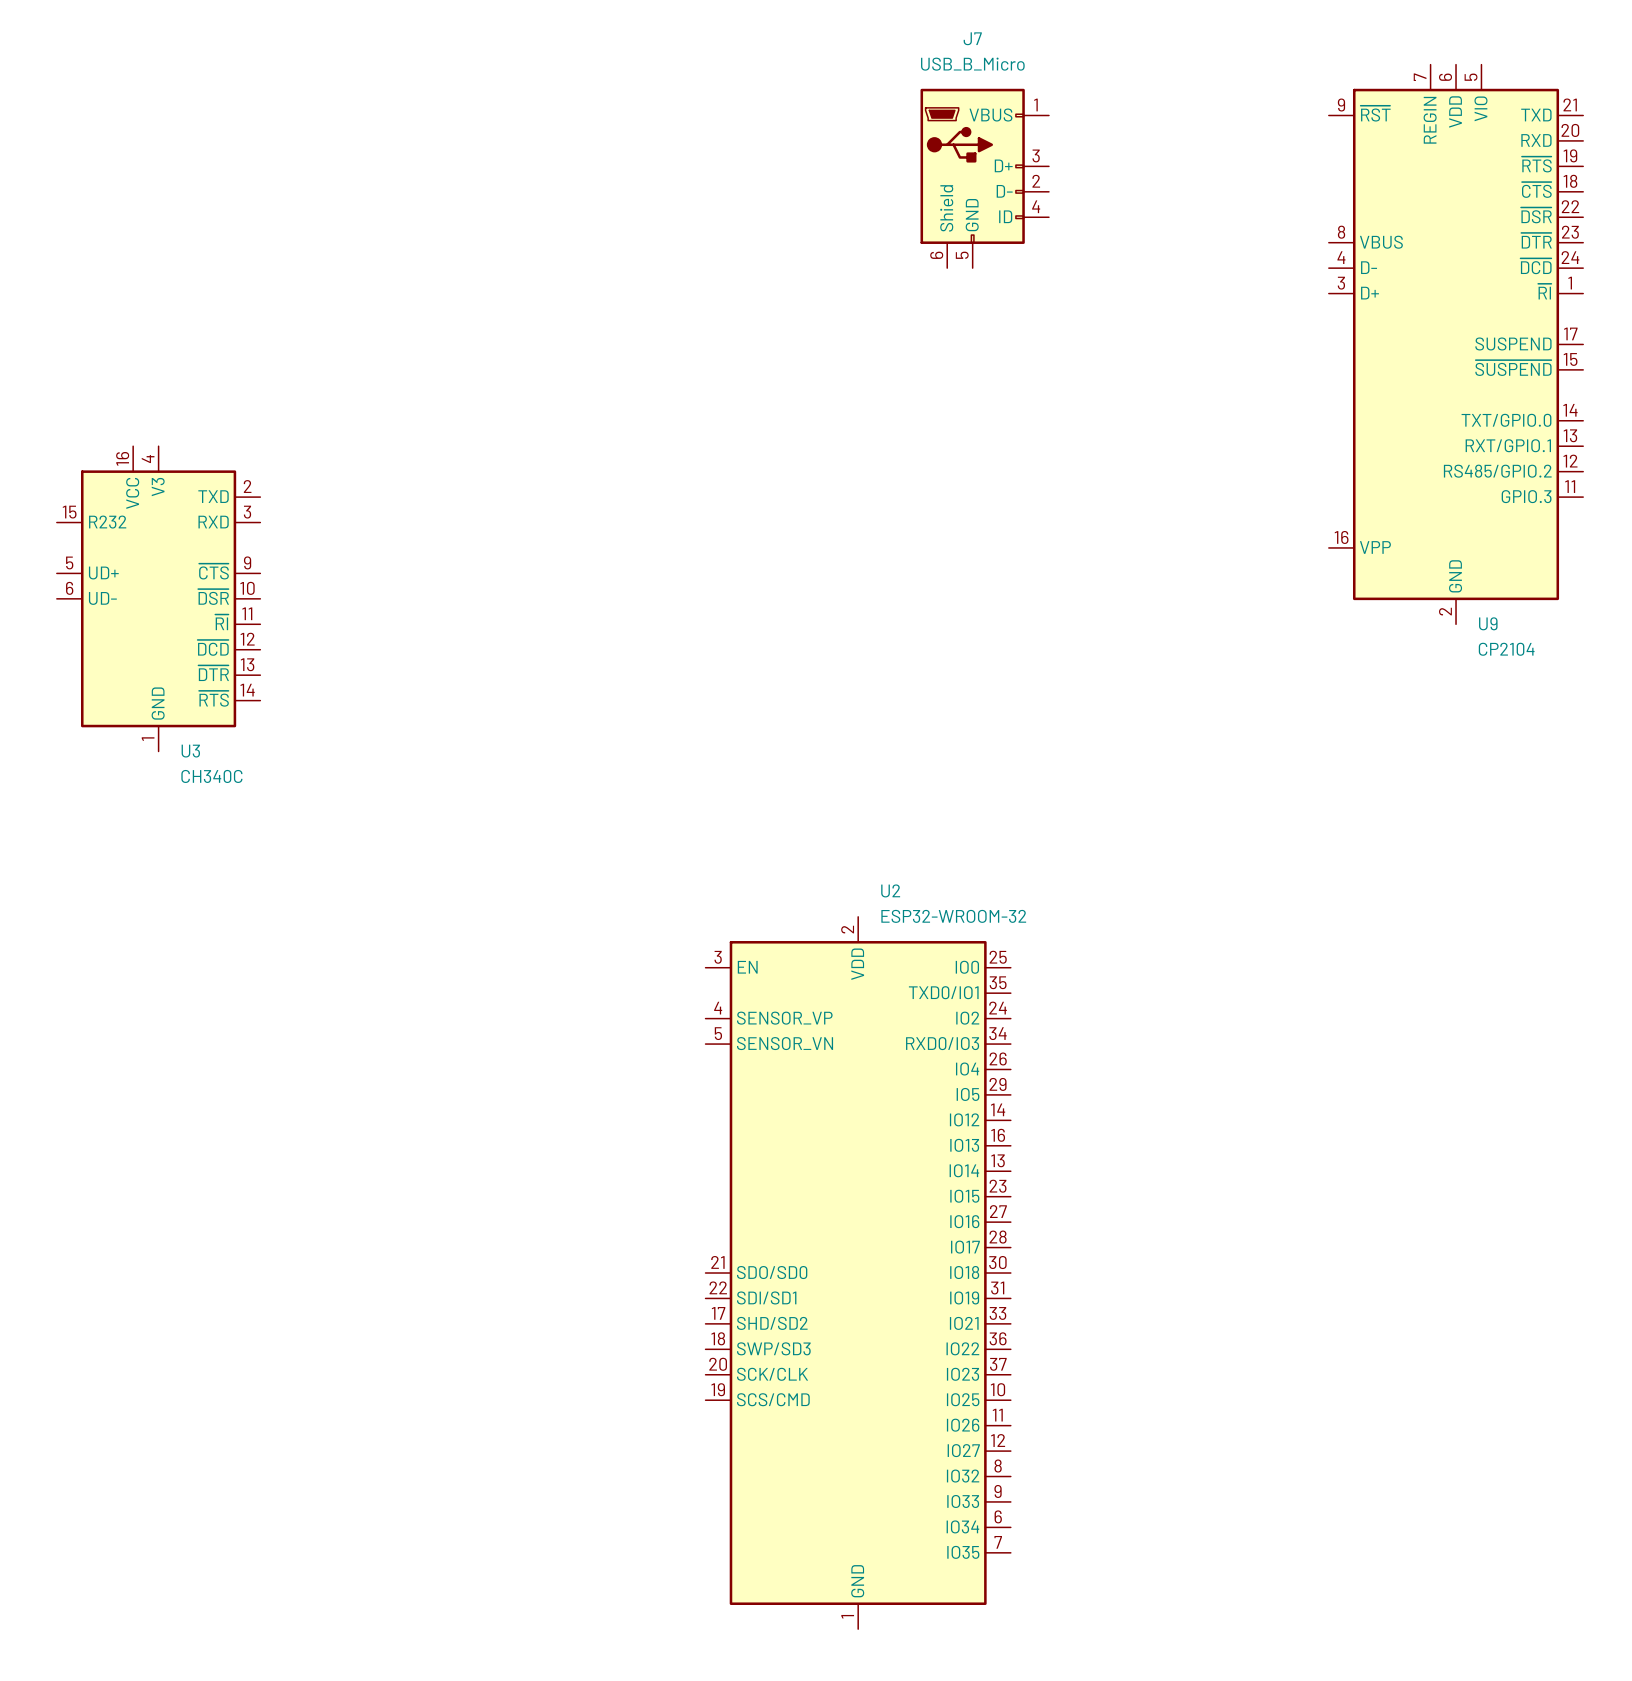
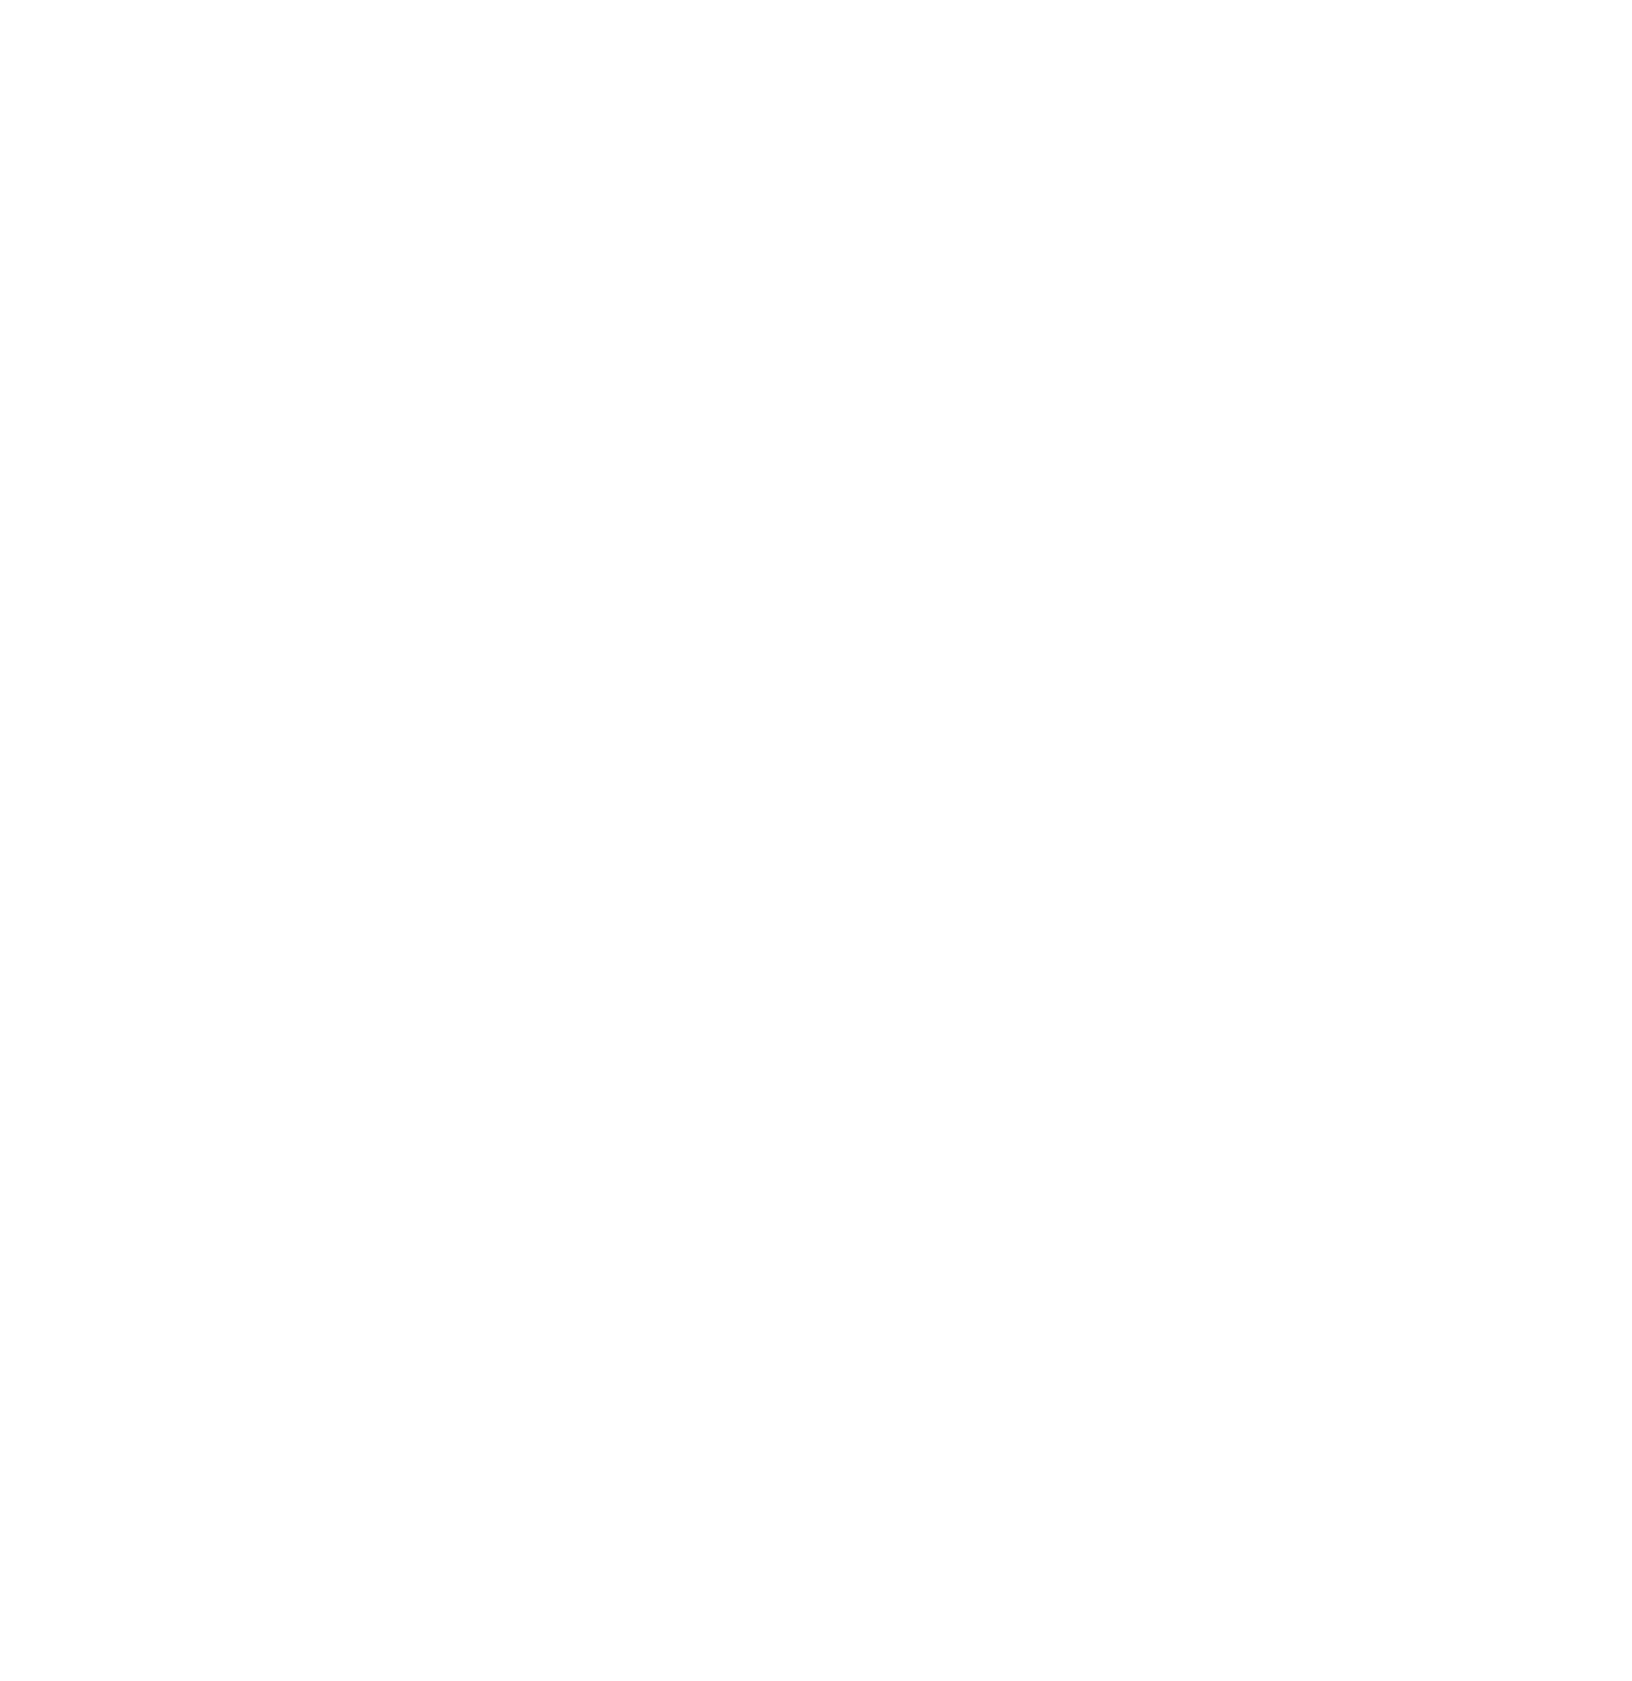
J7: USB_B_Micro (984, 178) -> none
U9: CP2104 (1456, 344) -> none
U3: CH340C (158, 598) -> none
U2: ESP32-WROOM-32 (858, 1273) -> none

